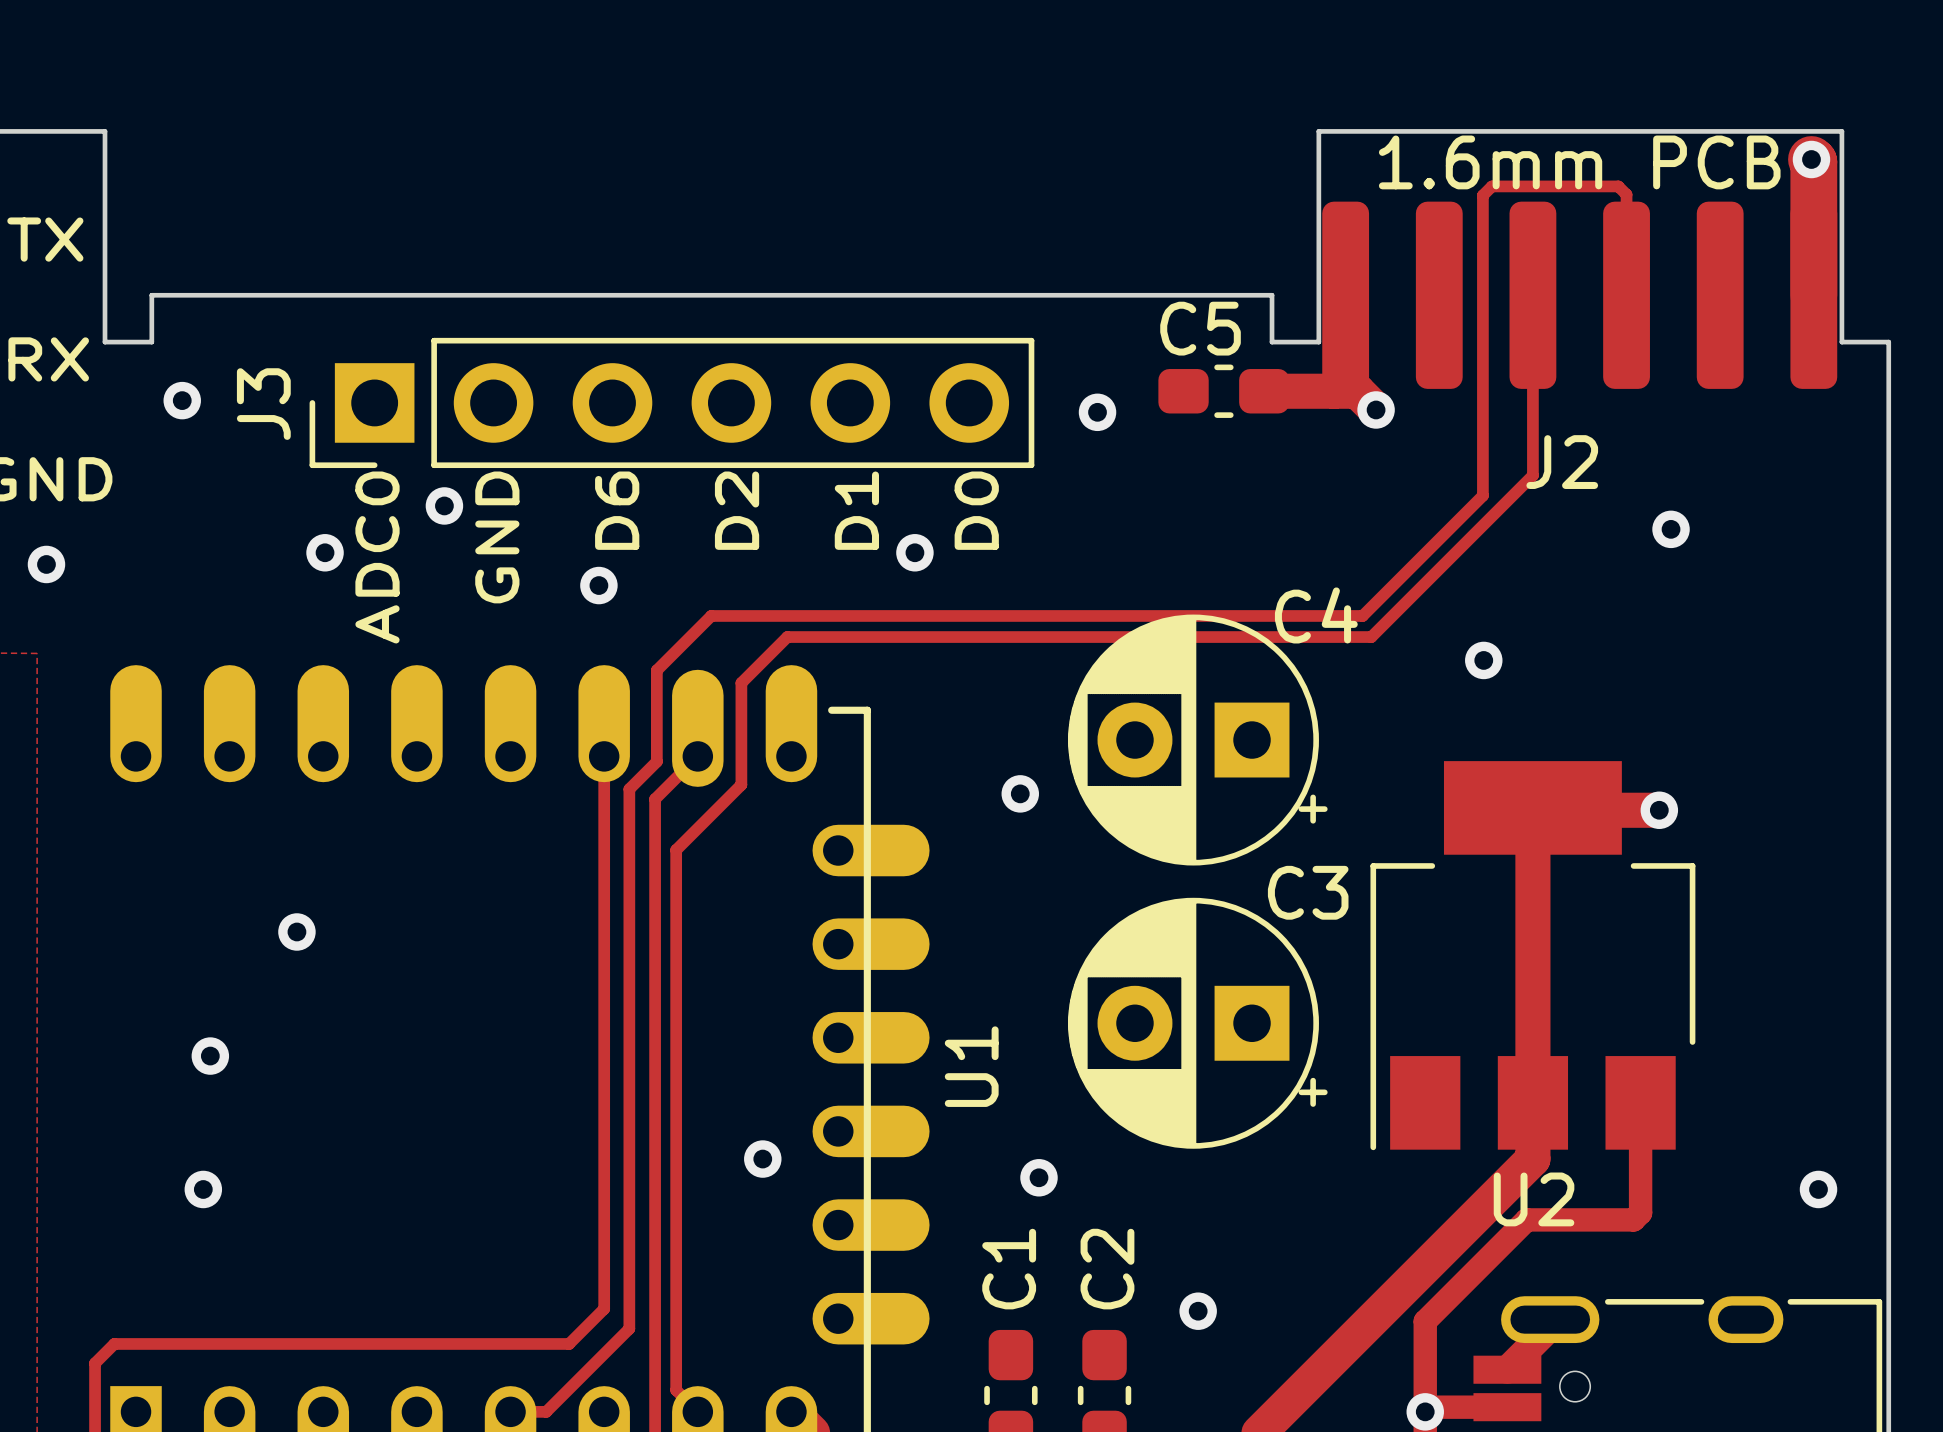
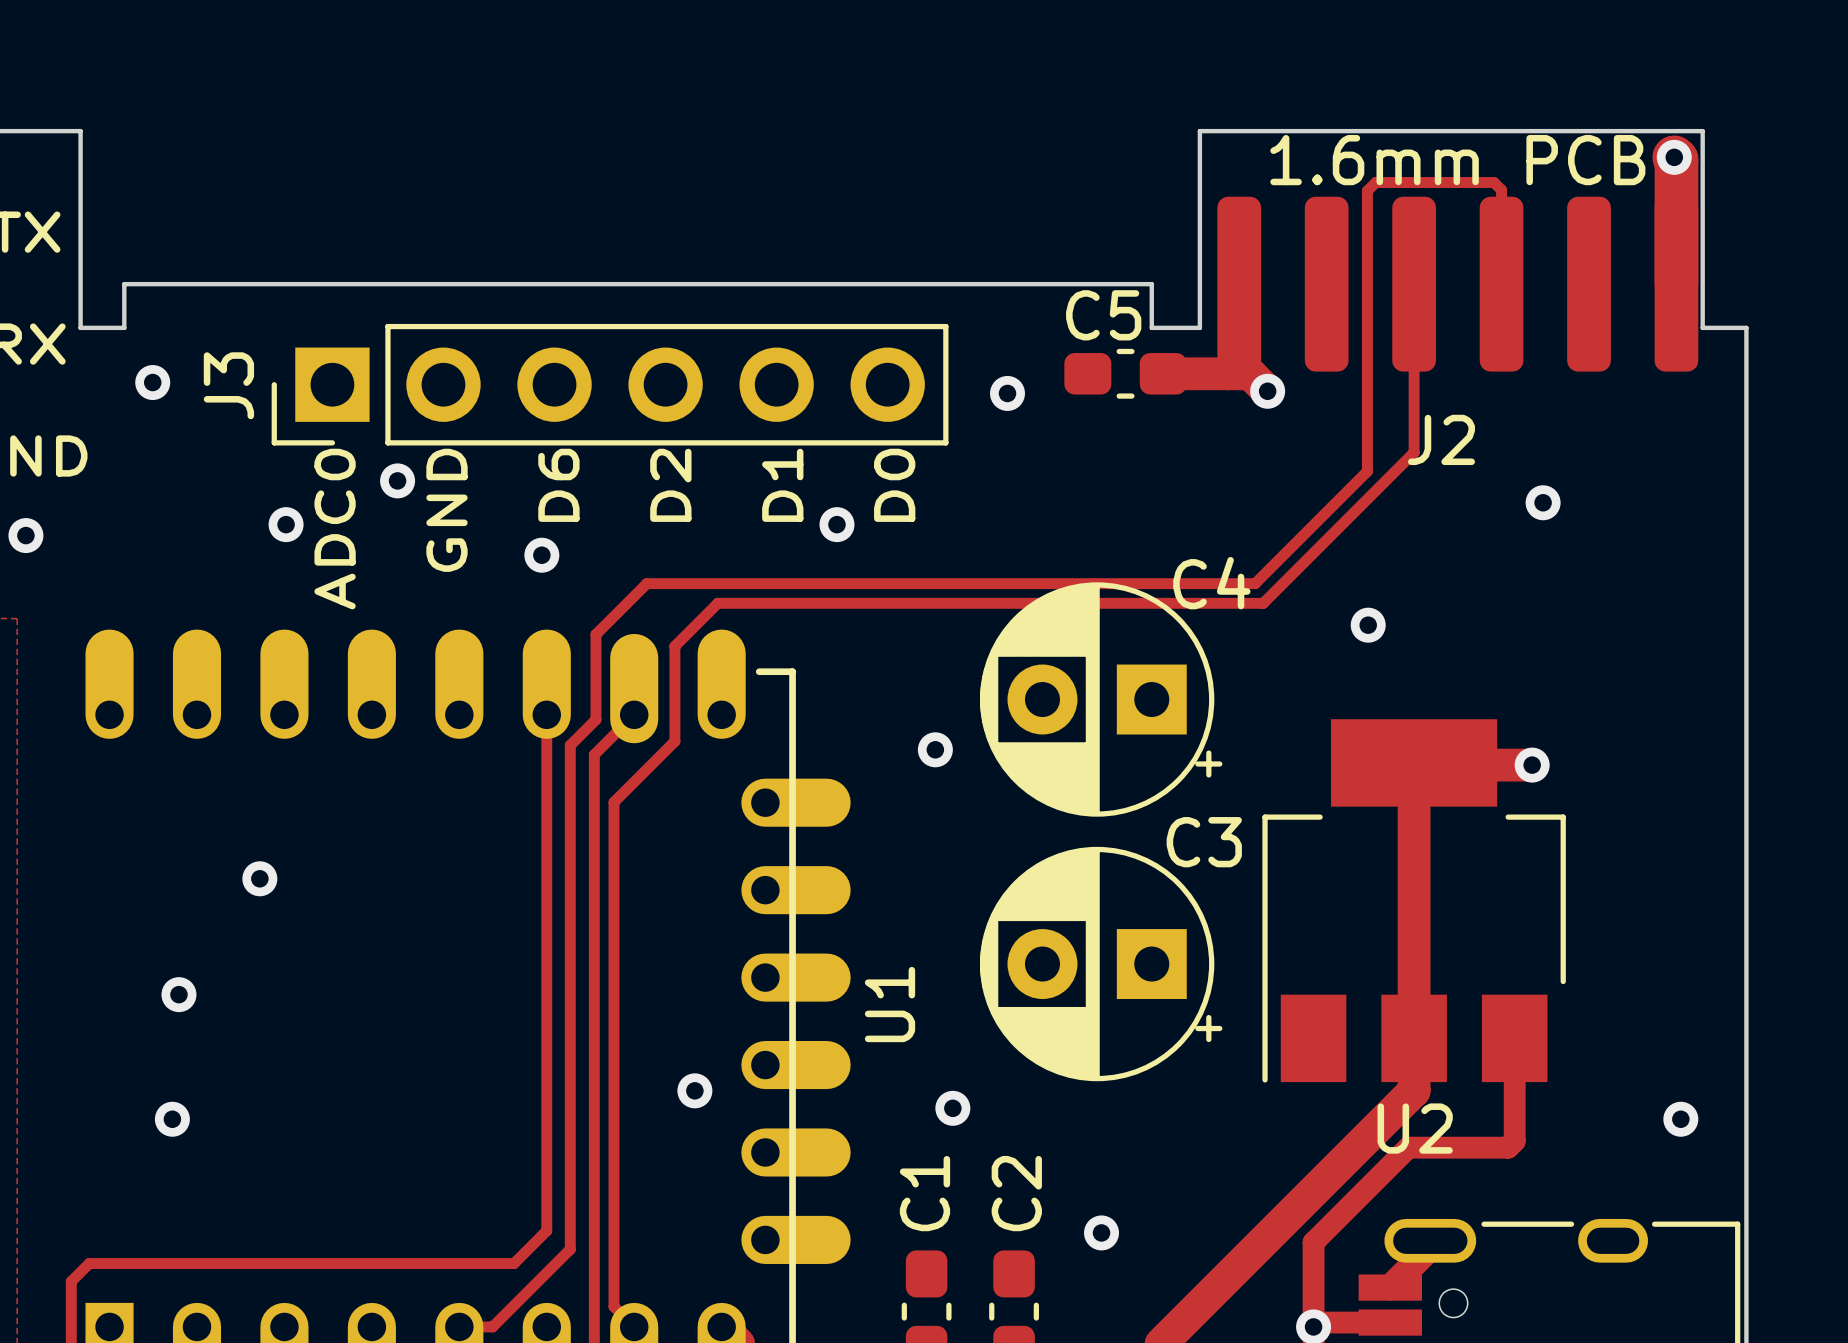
board edge: (1318, 131) (1318, 342) (1303, 342) -> (1214, 131) (1199, 131) (1199, 327)
board edge: (1252, 295) (1272, 295) (1272, 342) -> (1151, 284) (1151, 327) (1170, 327)

